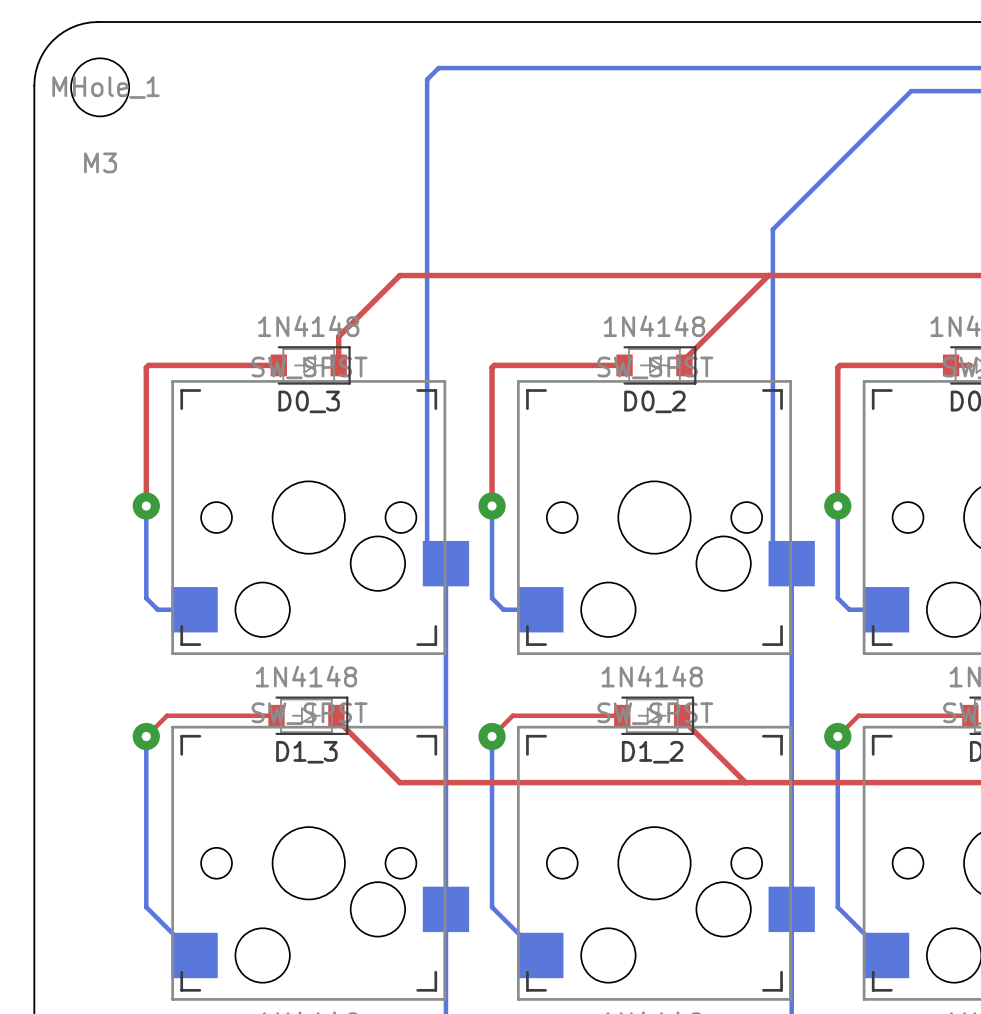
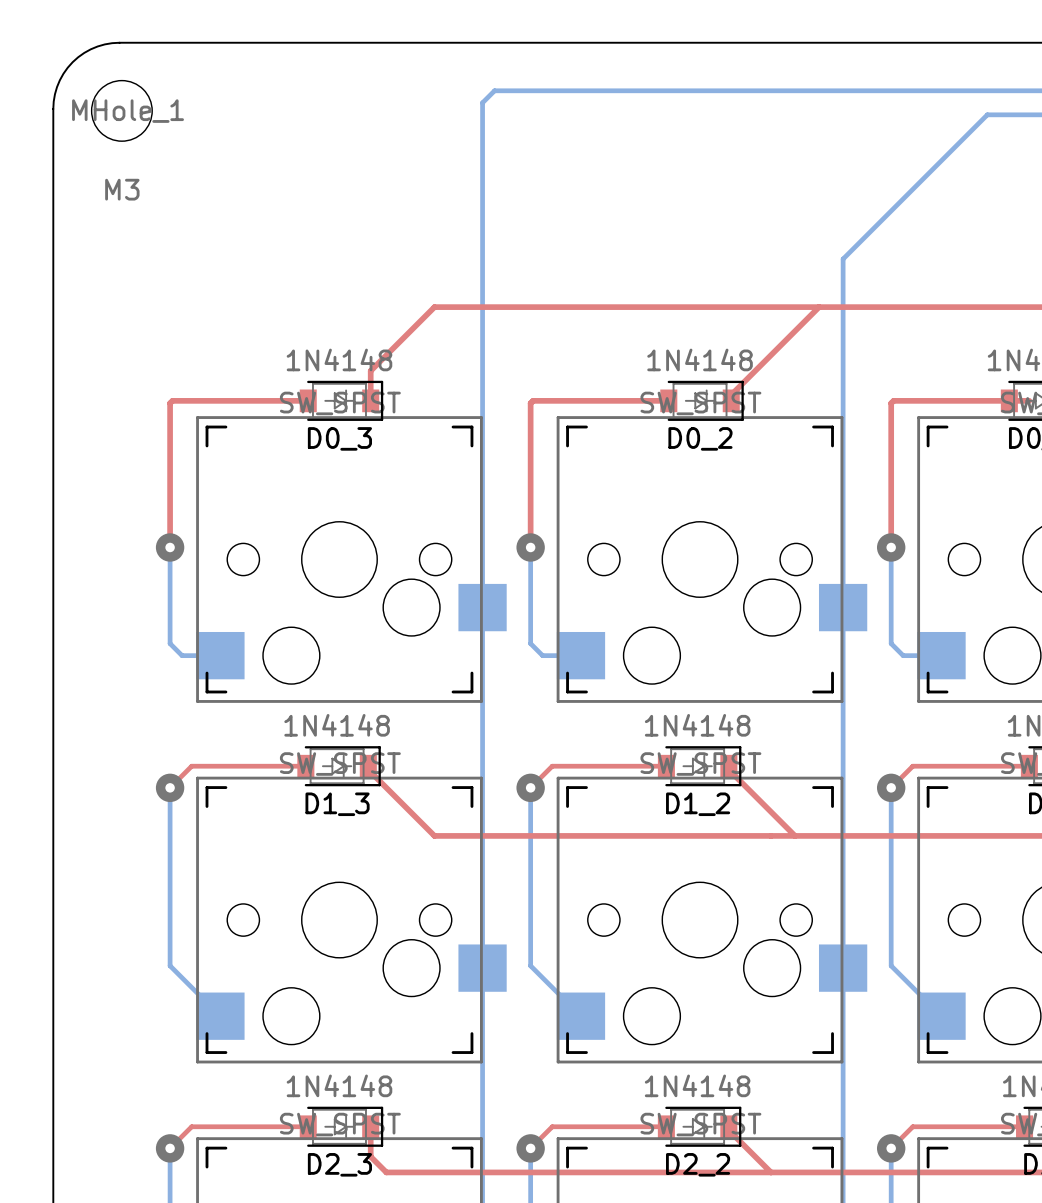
bottom track: (457, 68) (438, 68) (427, 79) (427, 563) -> (494, 90) (482, 102) (482, 607)
bottom track: (929, 91) (911, 91) (772, 229) (772, 563) -> (987, 114) (843, 259) (843, 607)

